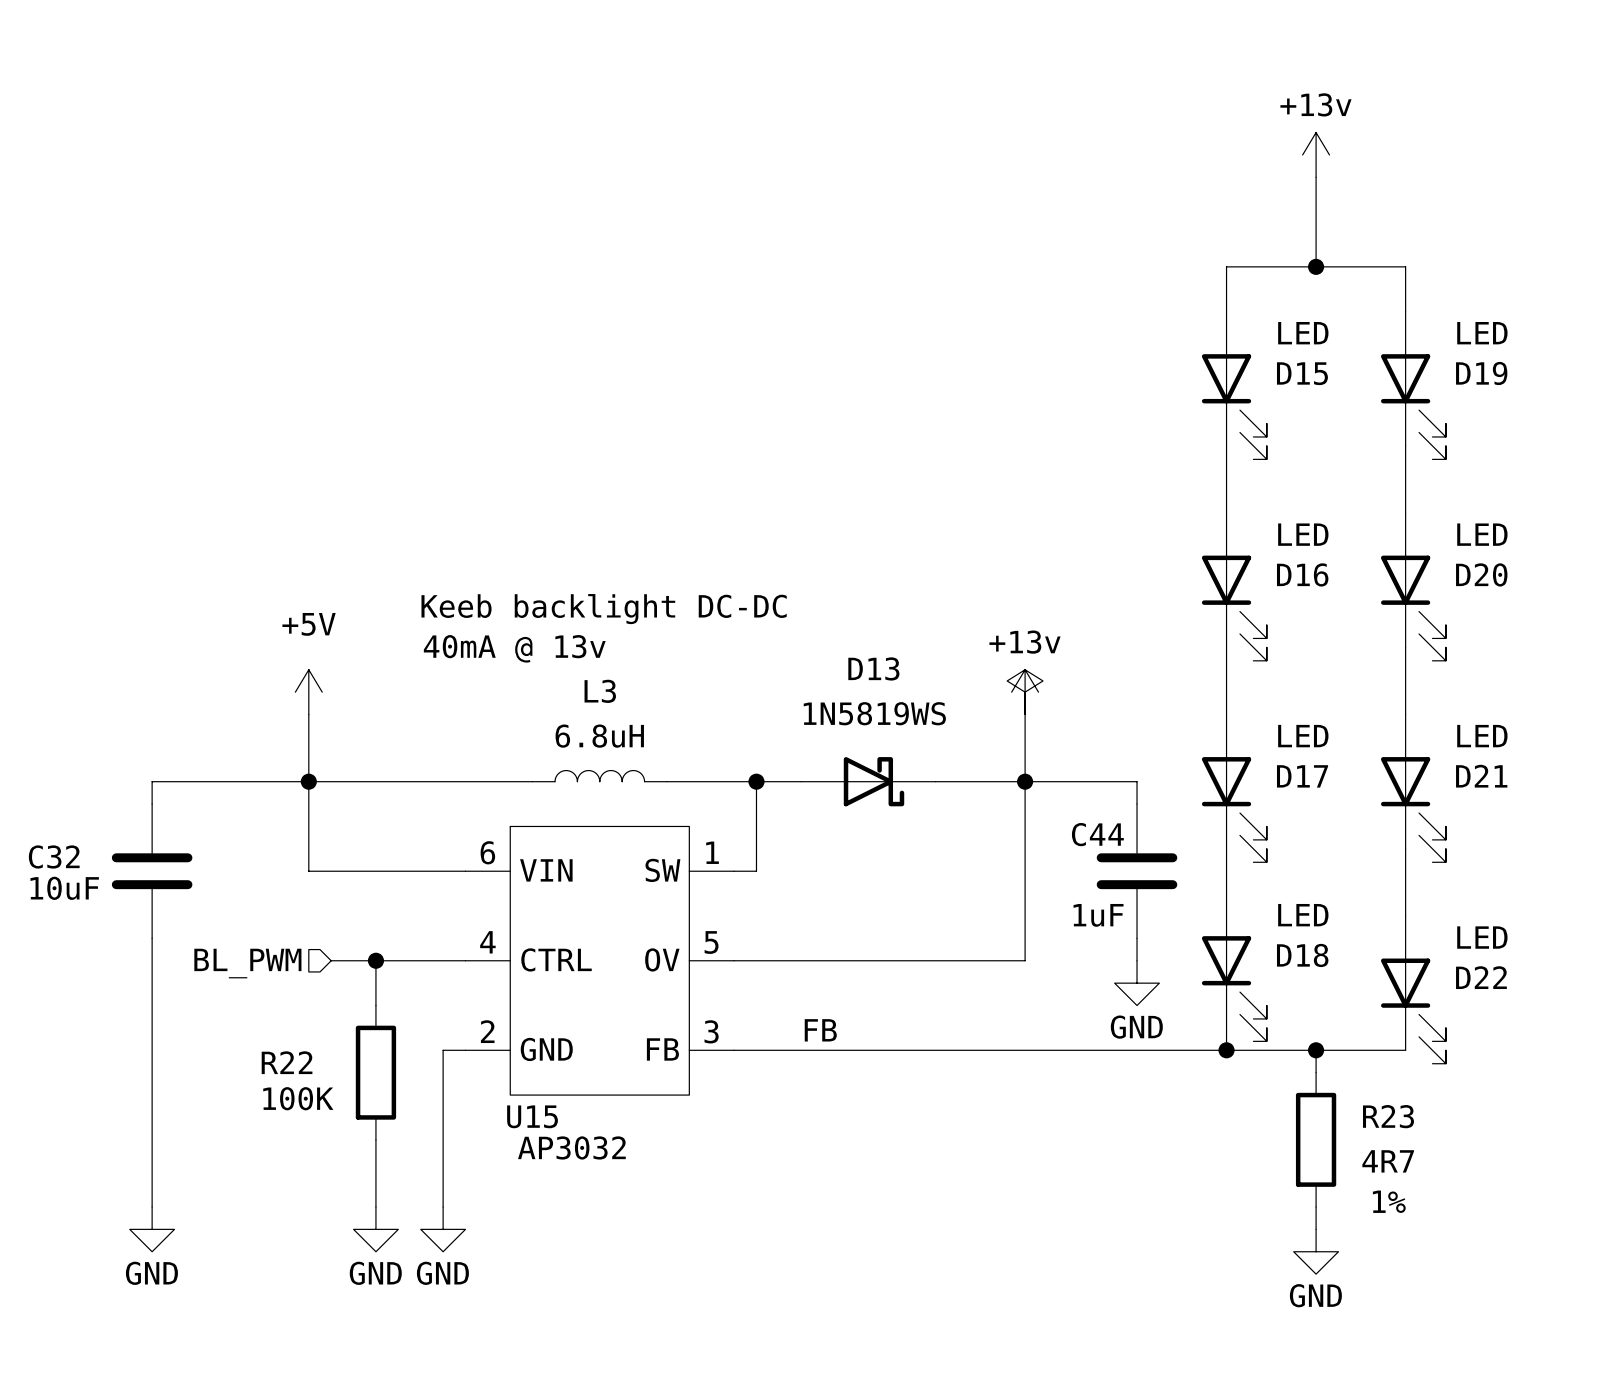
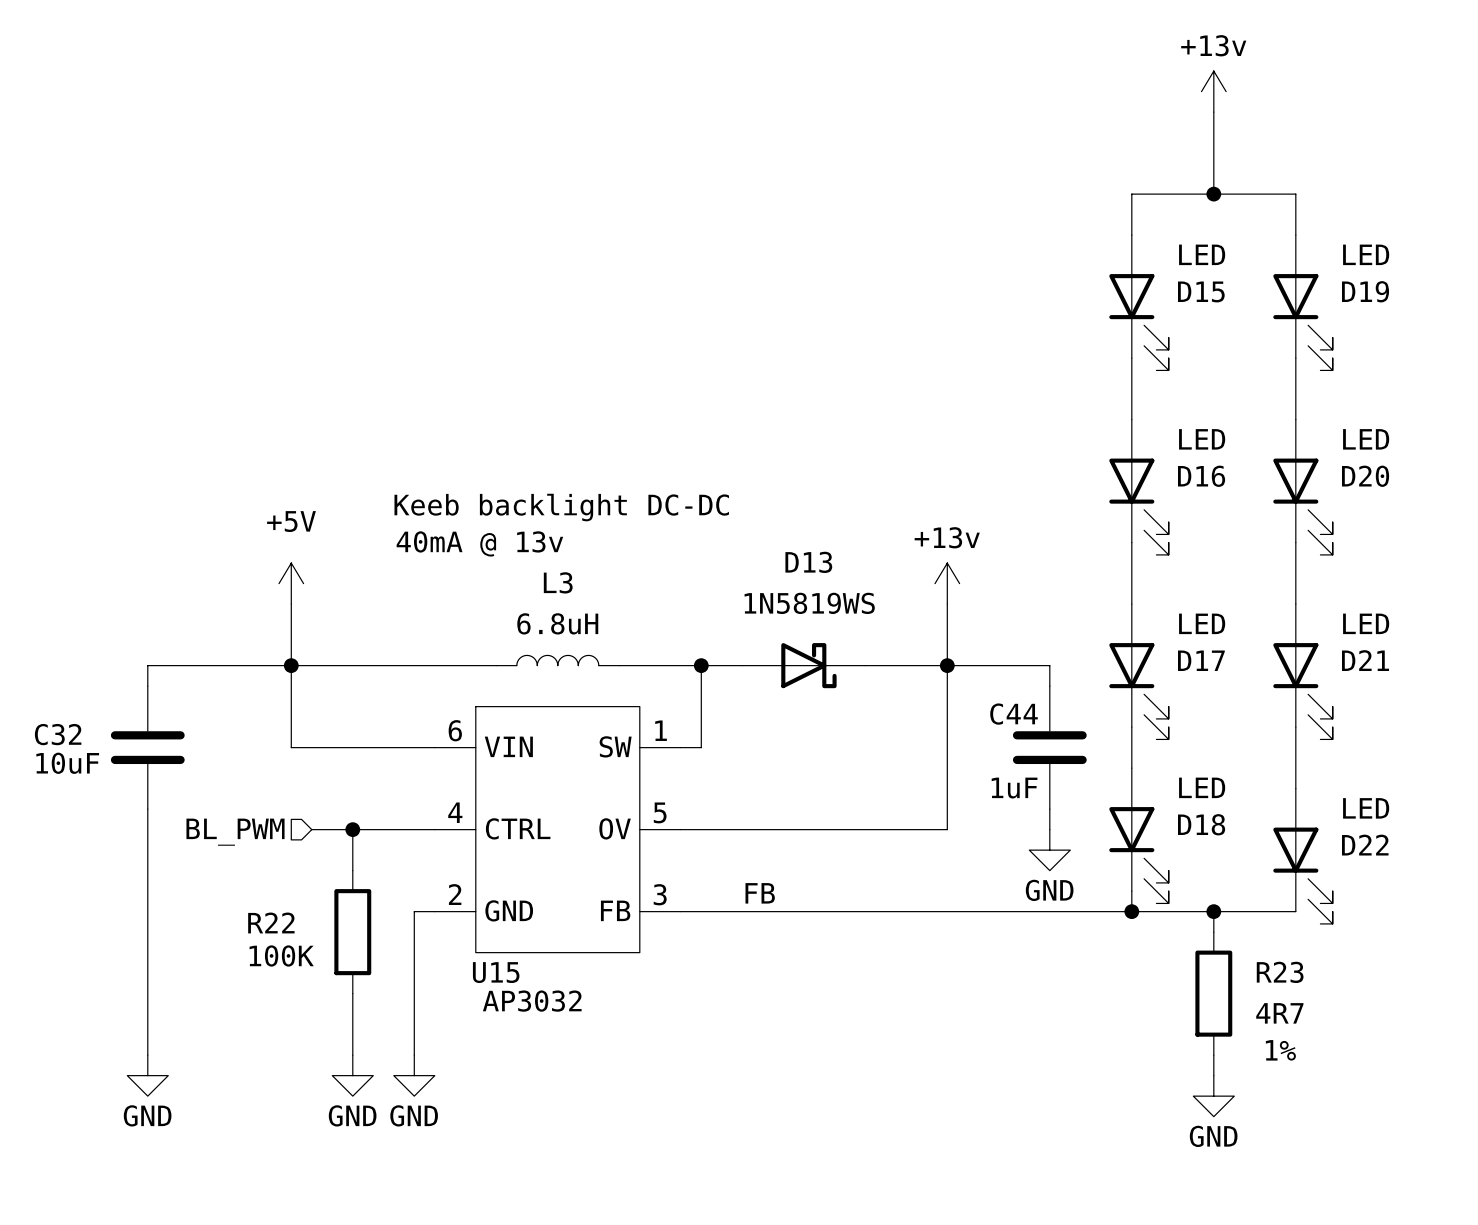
power symbol: (1025, 692) -> none

